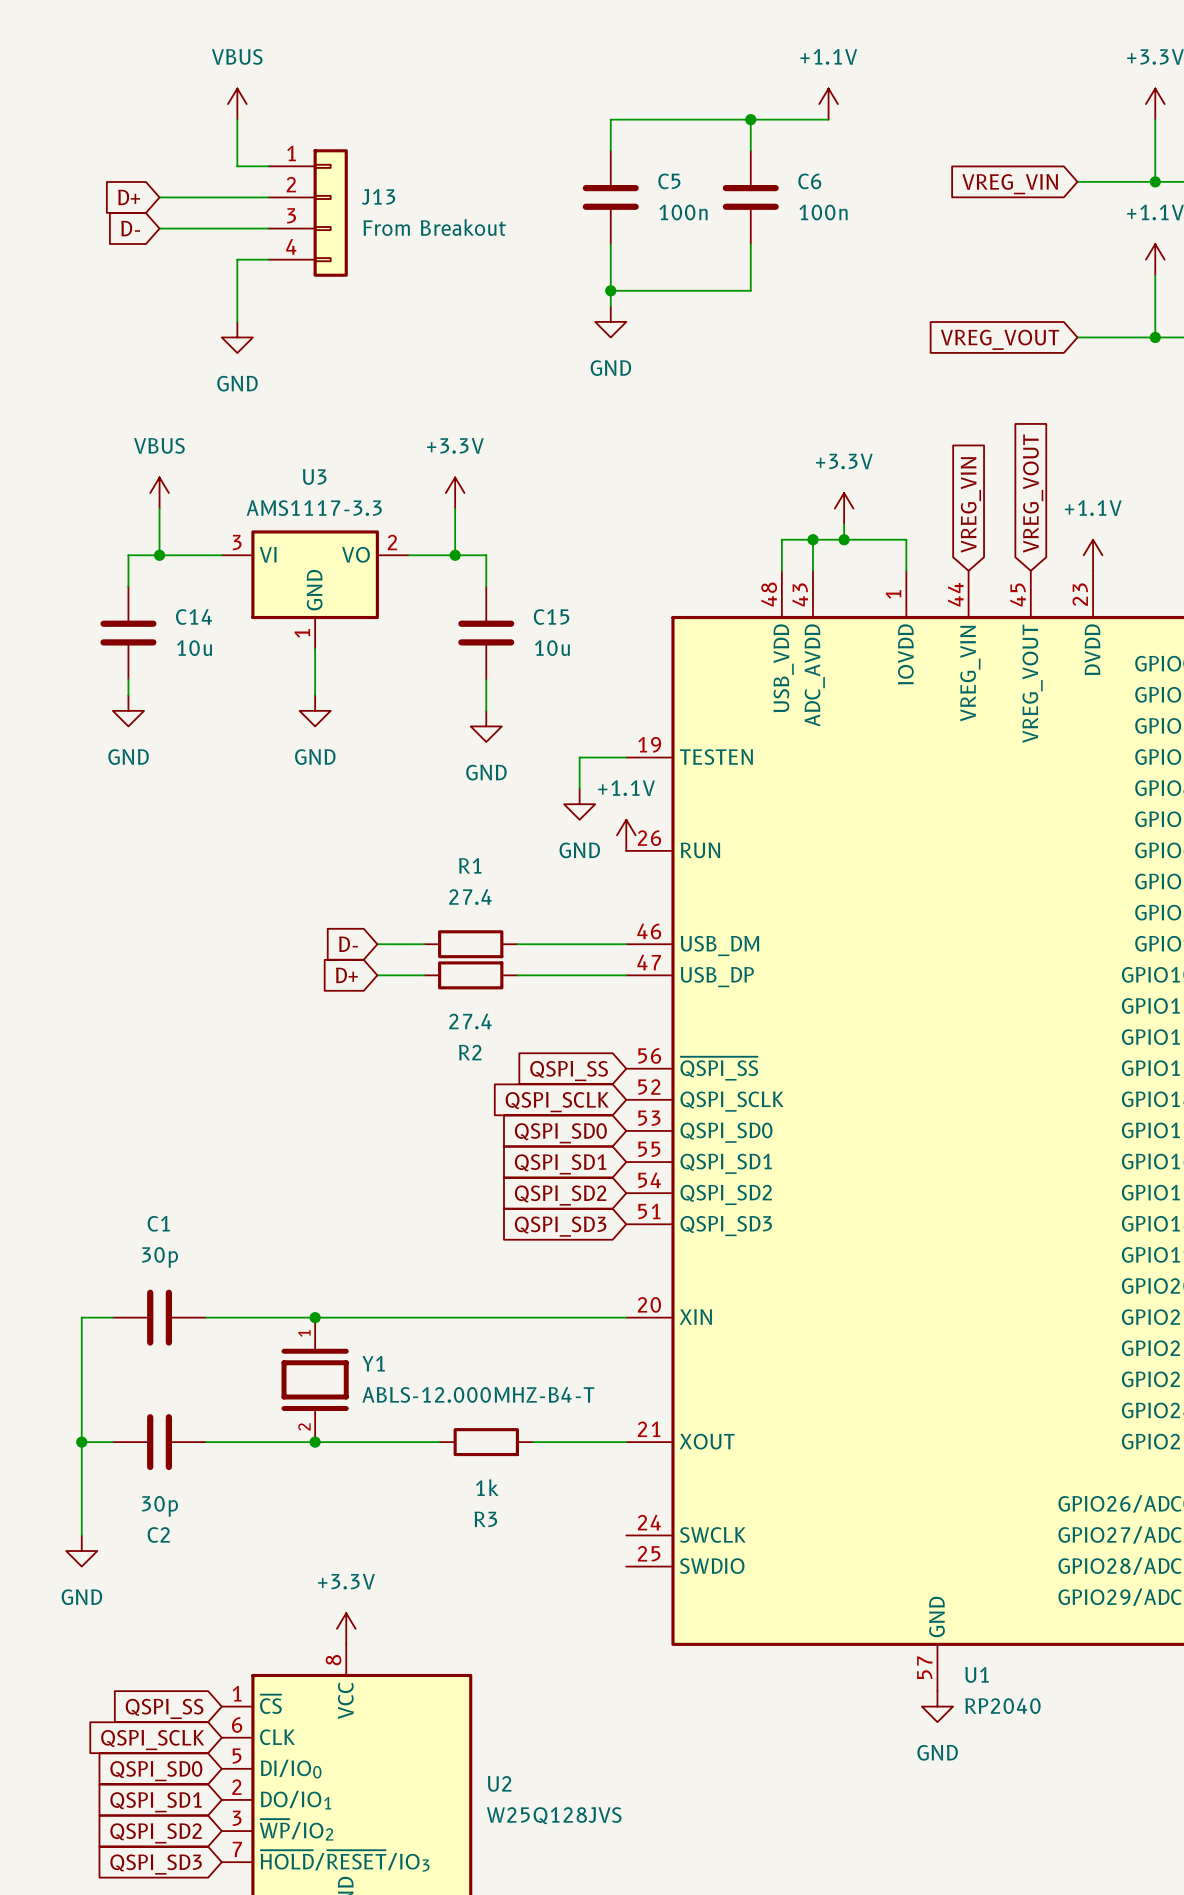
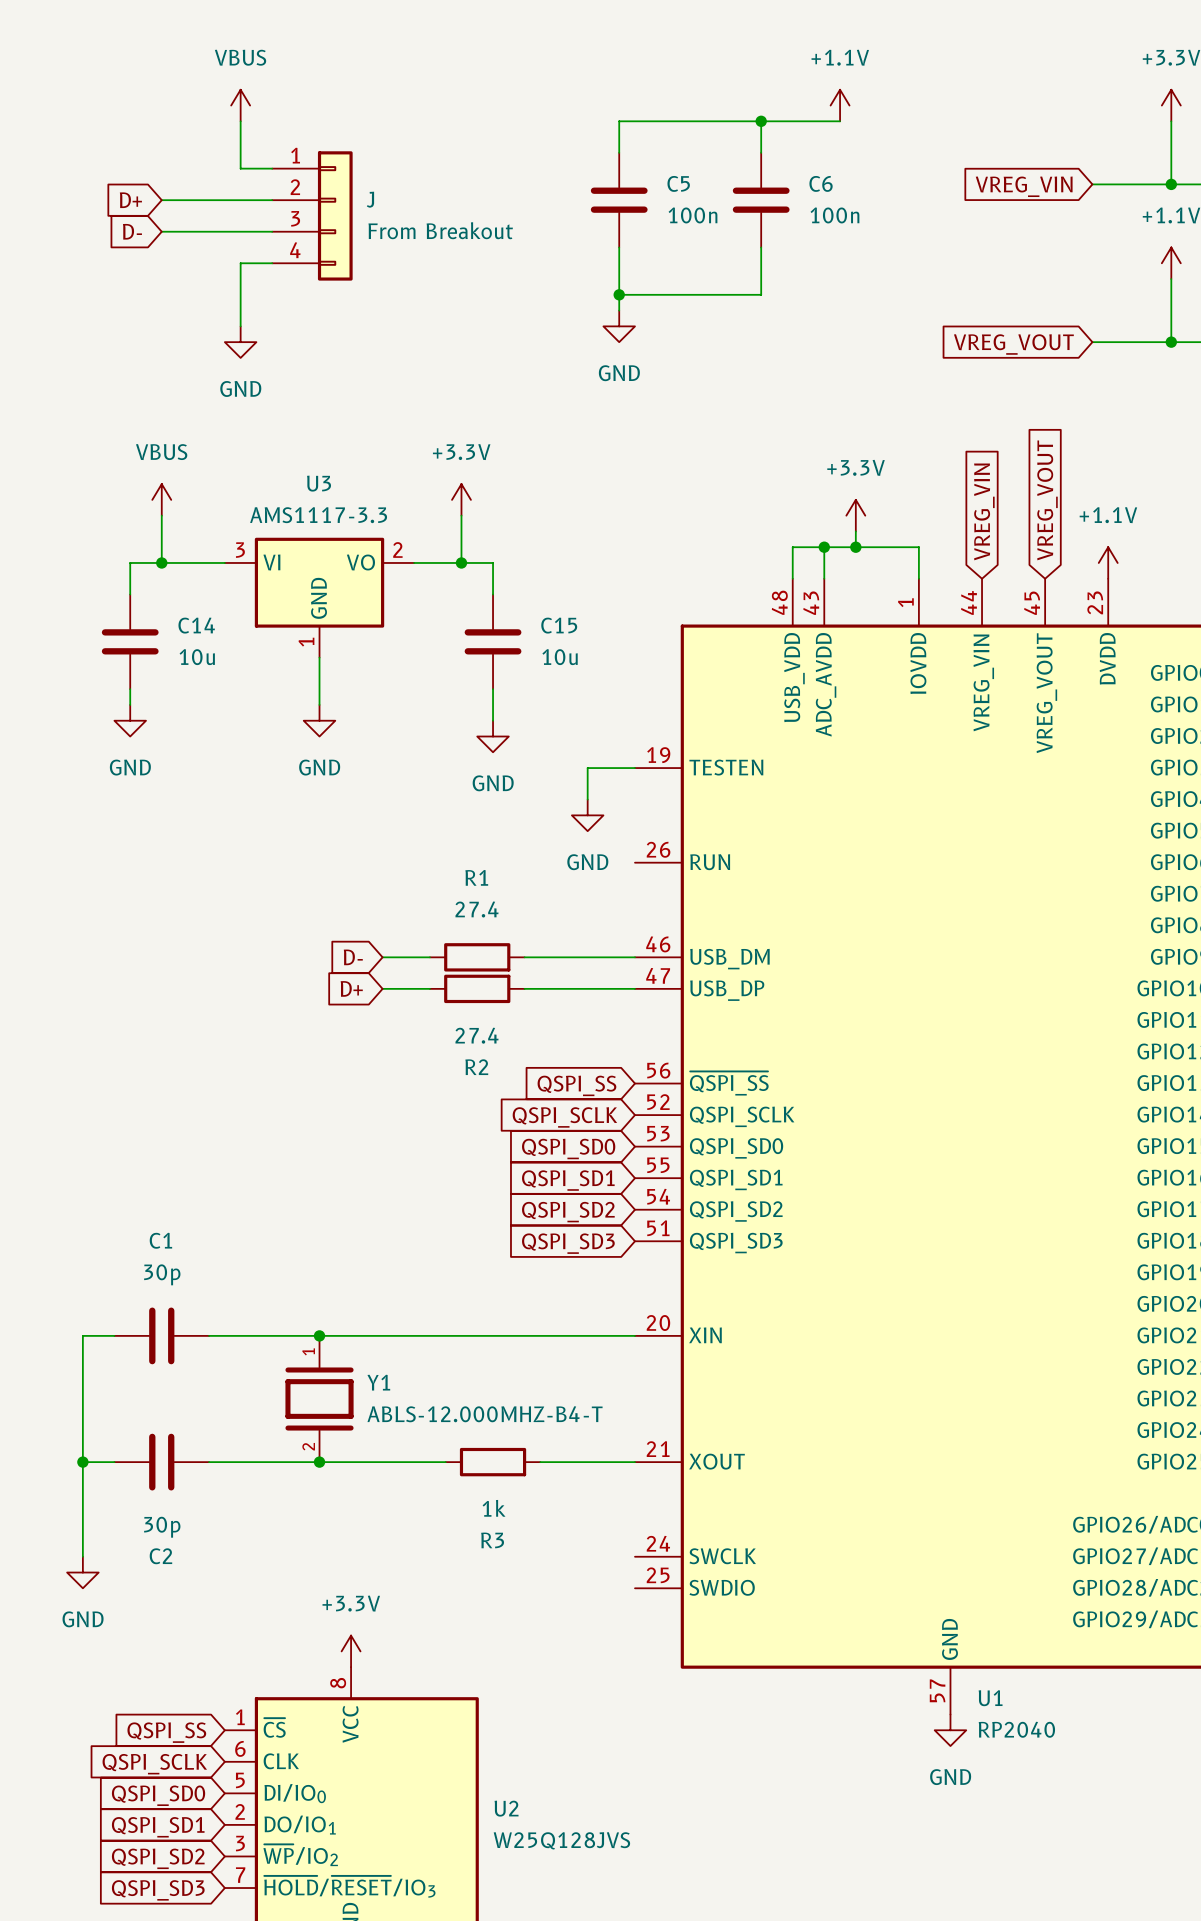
J13 name: J13 (378, 196) -> J (370, 199)
power symbol: +1.1V (626, 835) -> none

